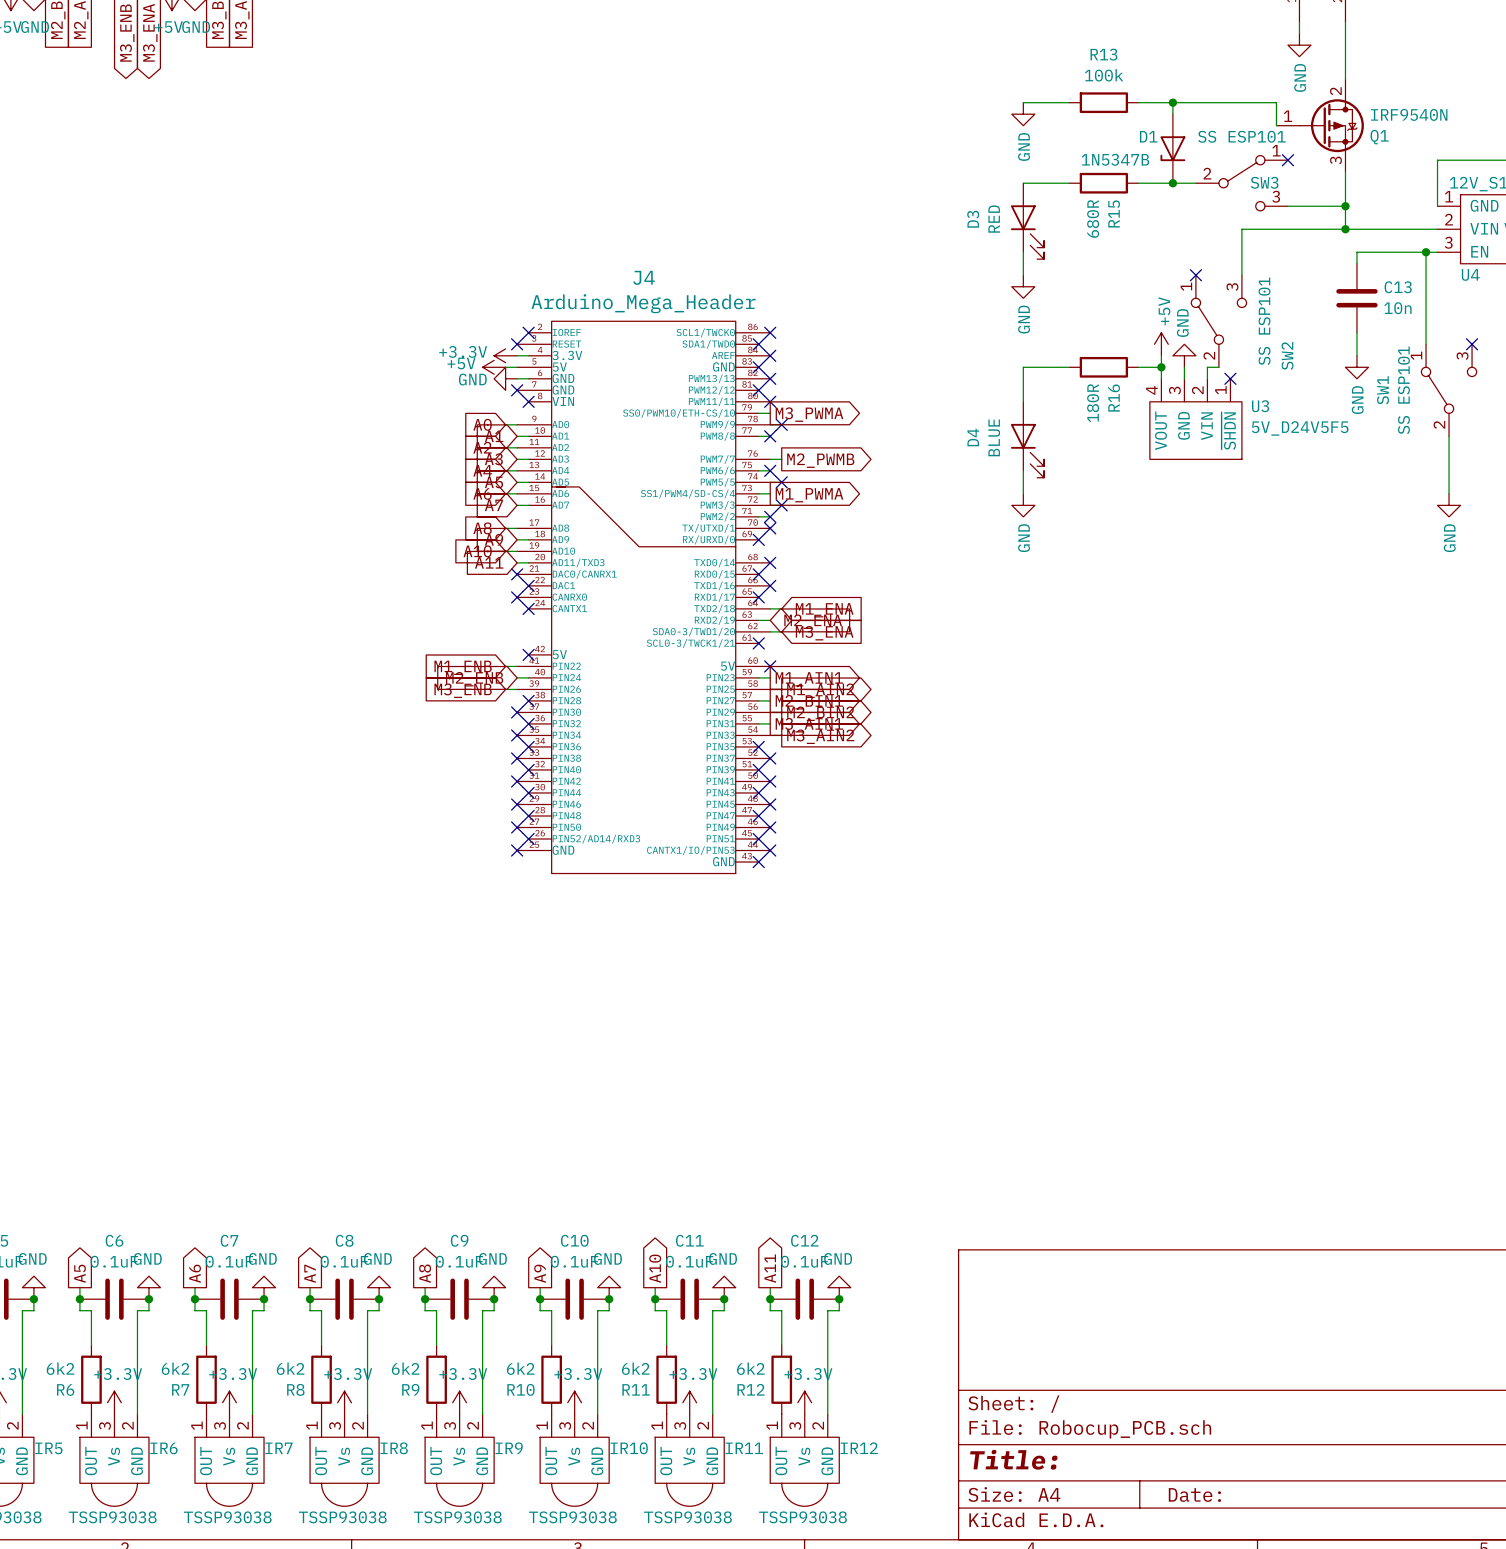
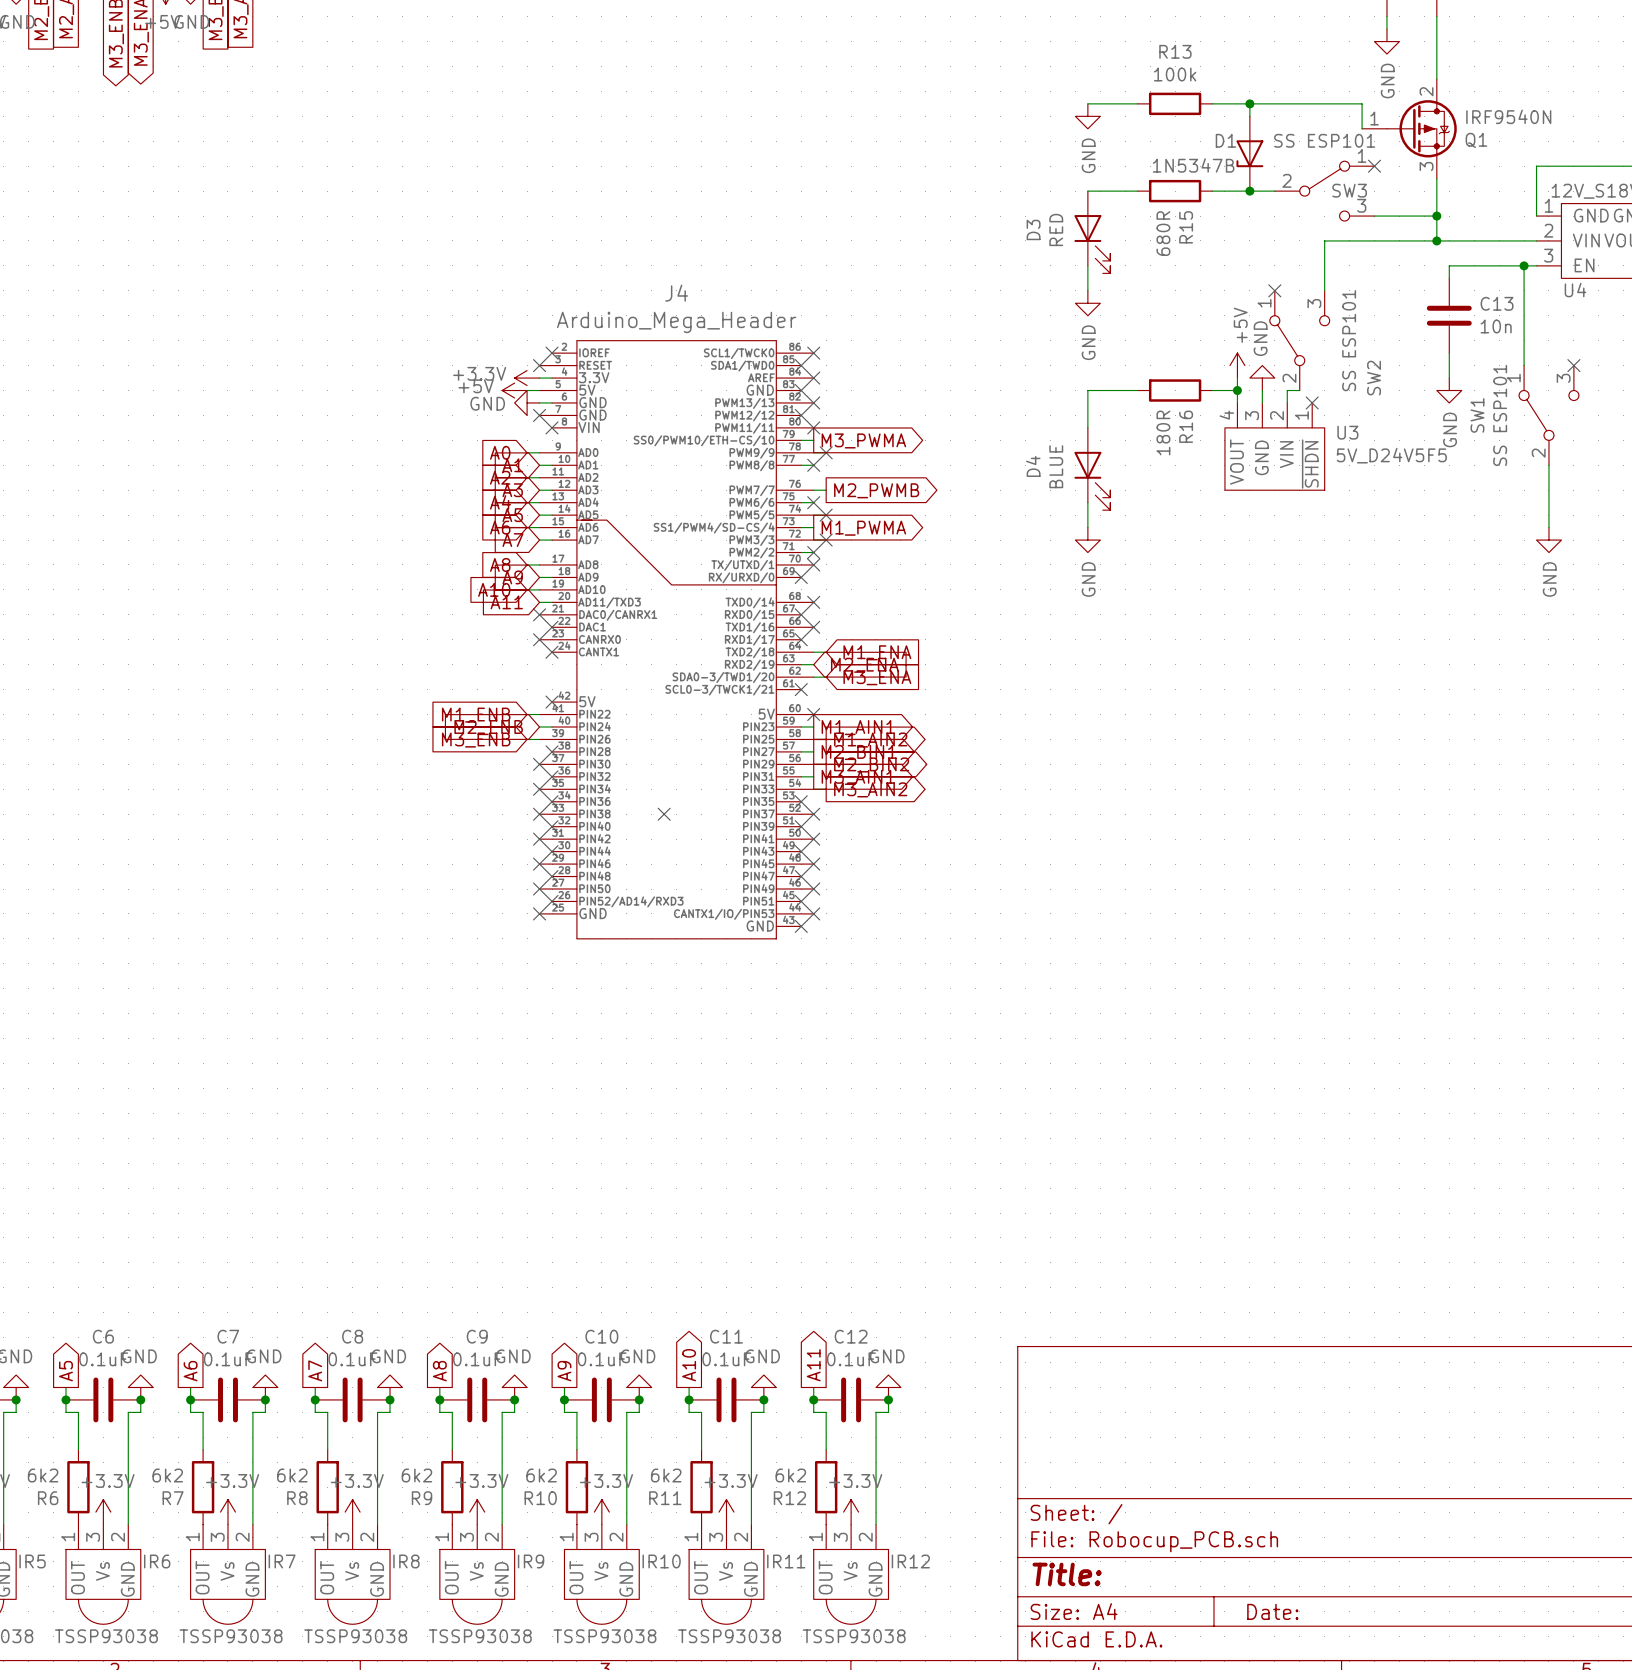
no-connect mark: none -> (664, 814)

